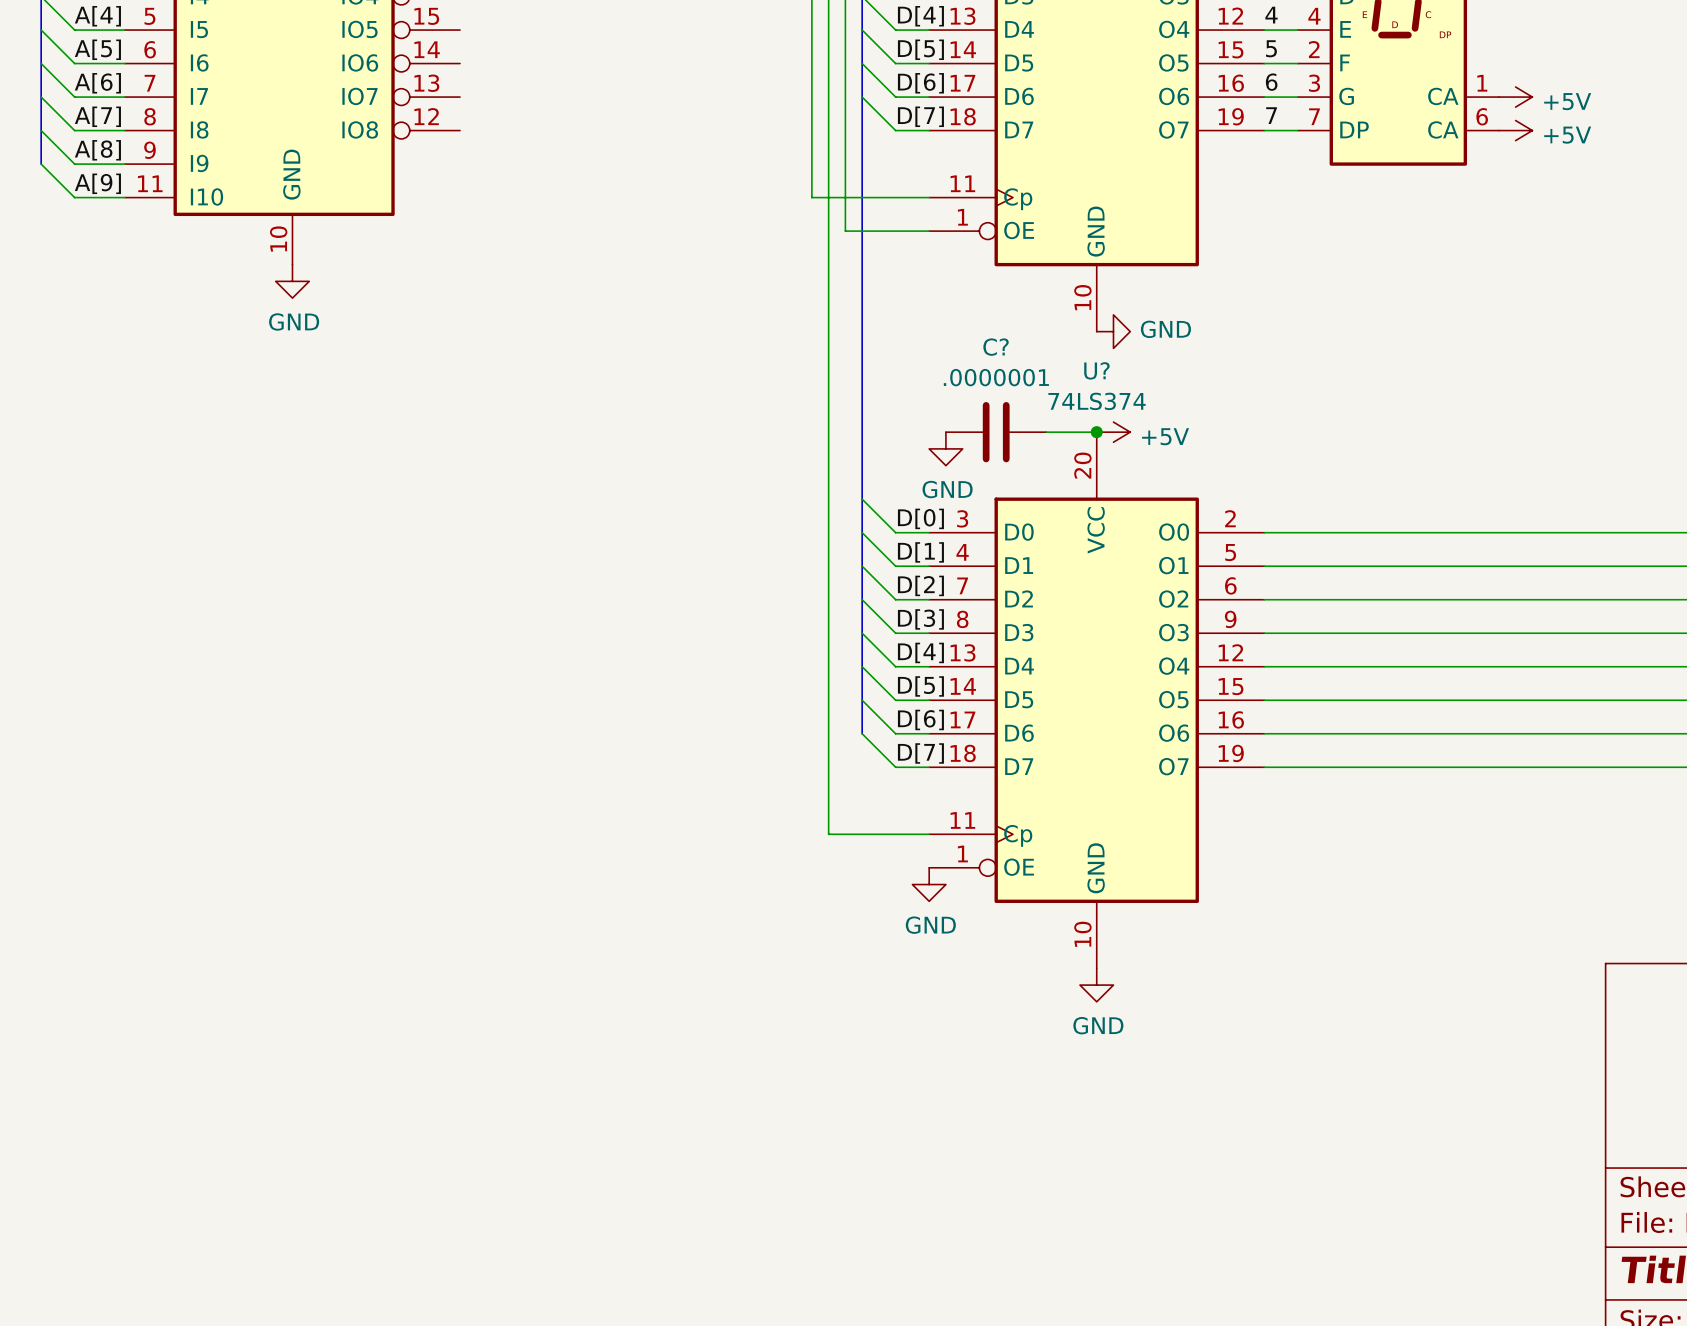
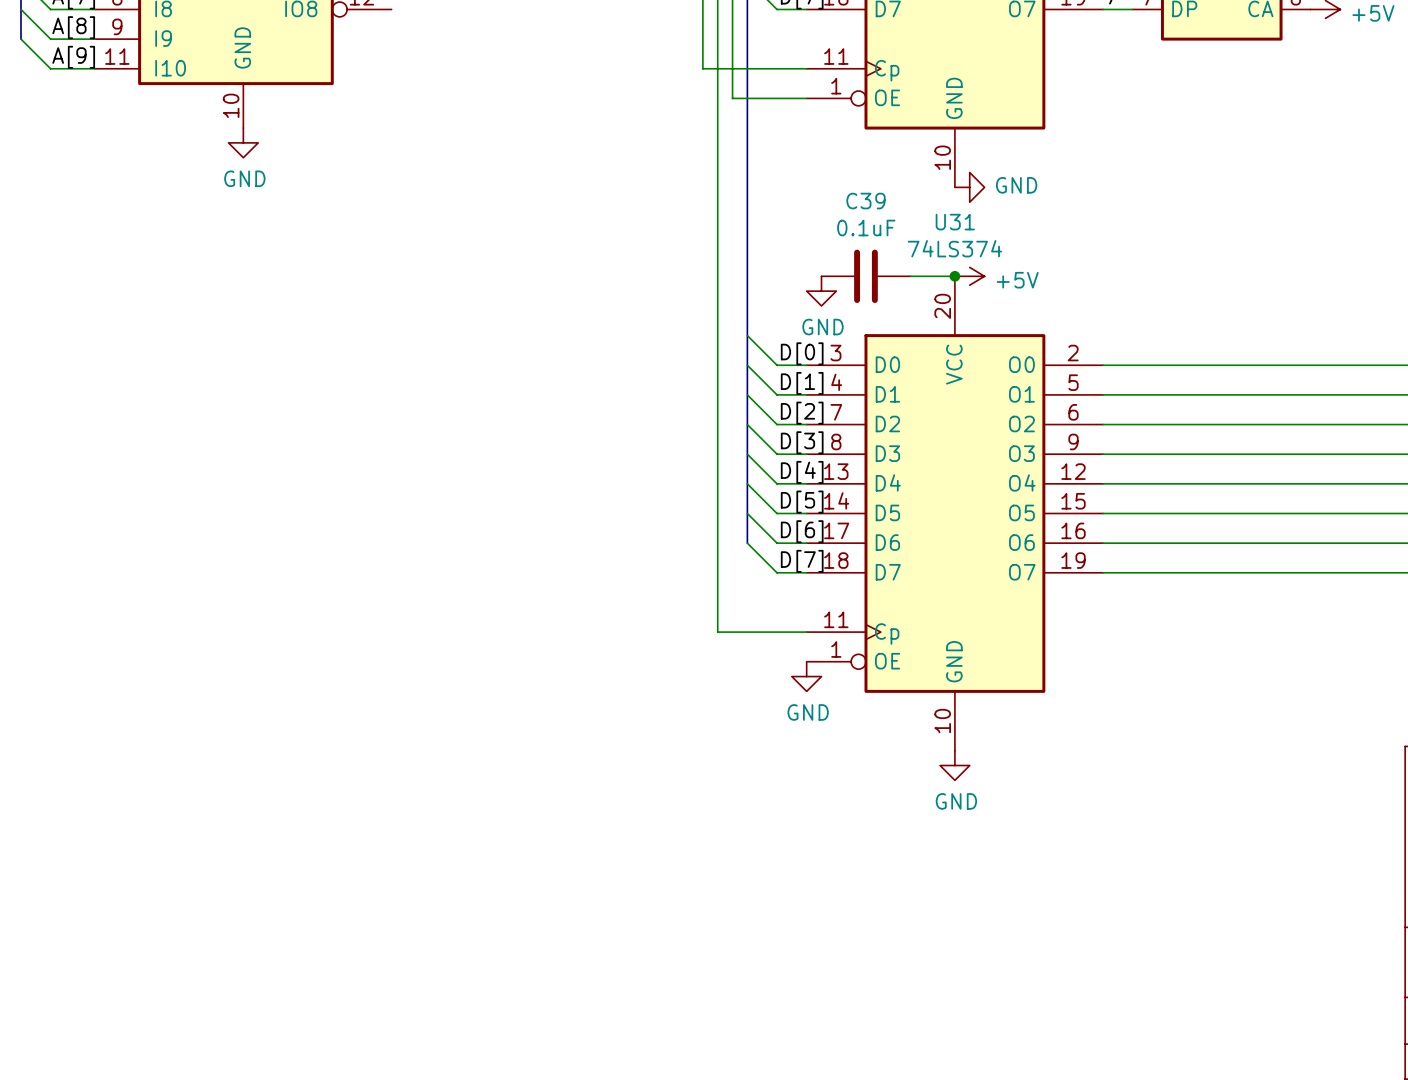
C? name: C? (996, 347) -> C39 (865, 201)
U? name: U? (1096, 370) -> U31 (955, 222)
C? value: .0000001 (996, 377) -> 0.1uF (866, 228)

